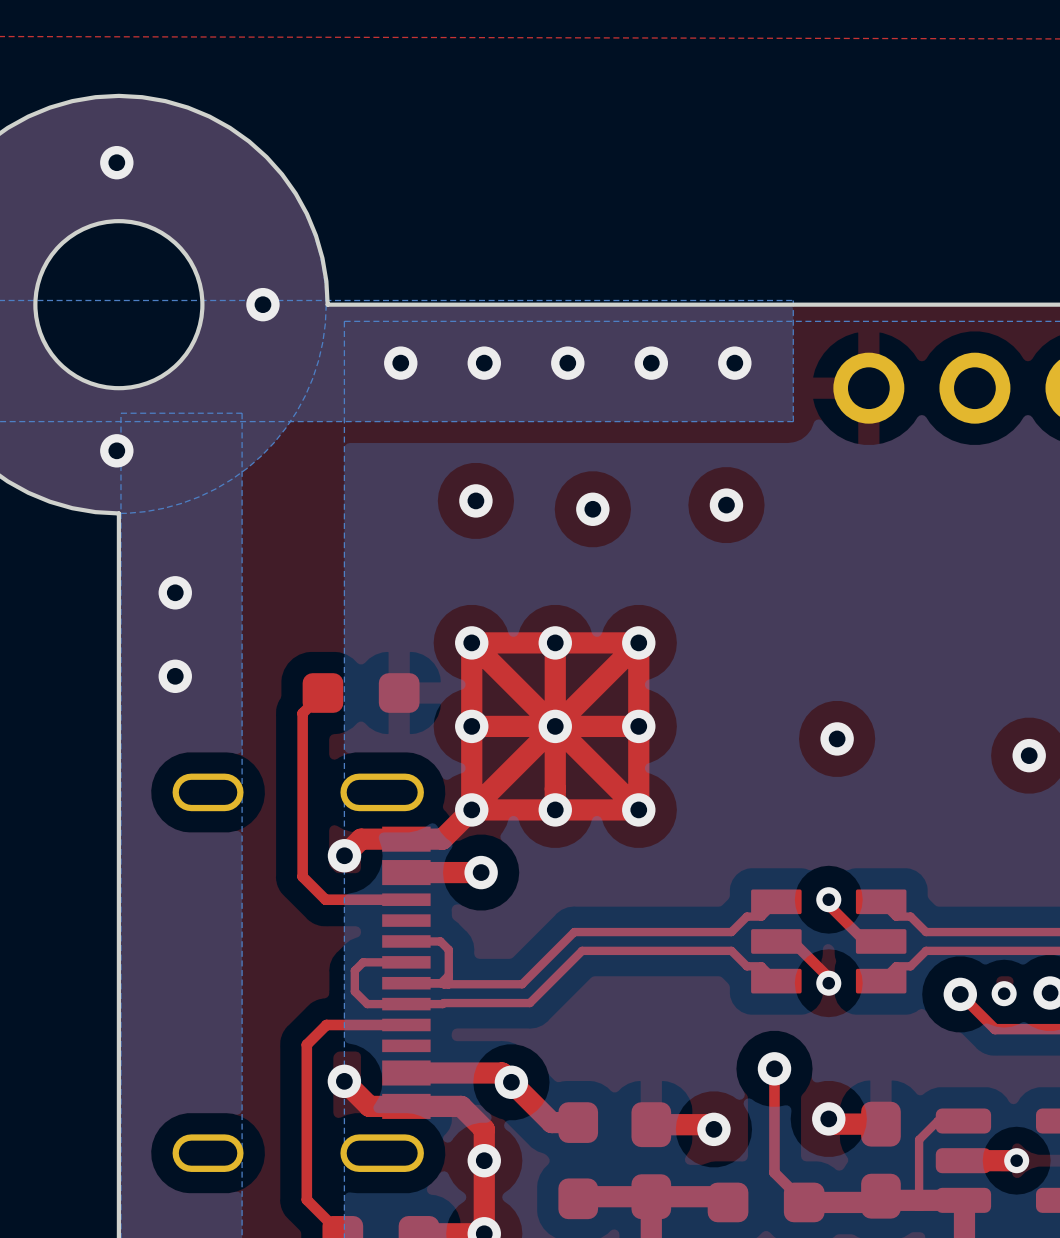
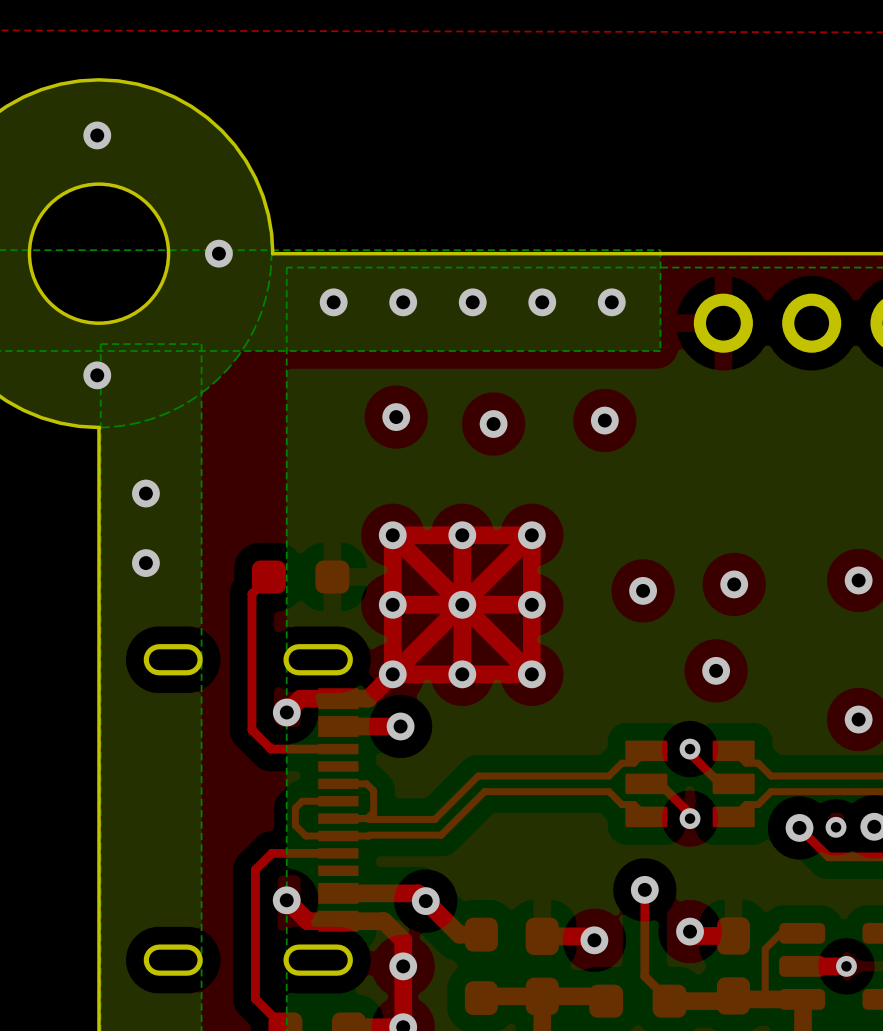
via: none -> (858, 580)
via: none -> (734, 584)
via: none -> (643, 590)
via: (837, 738) -> none
via: (1029, 755) -> none
via: none -> (716, 670)
via: none -> (858, 719)

